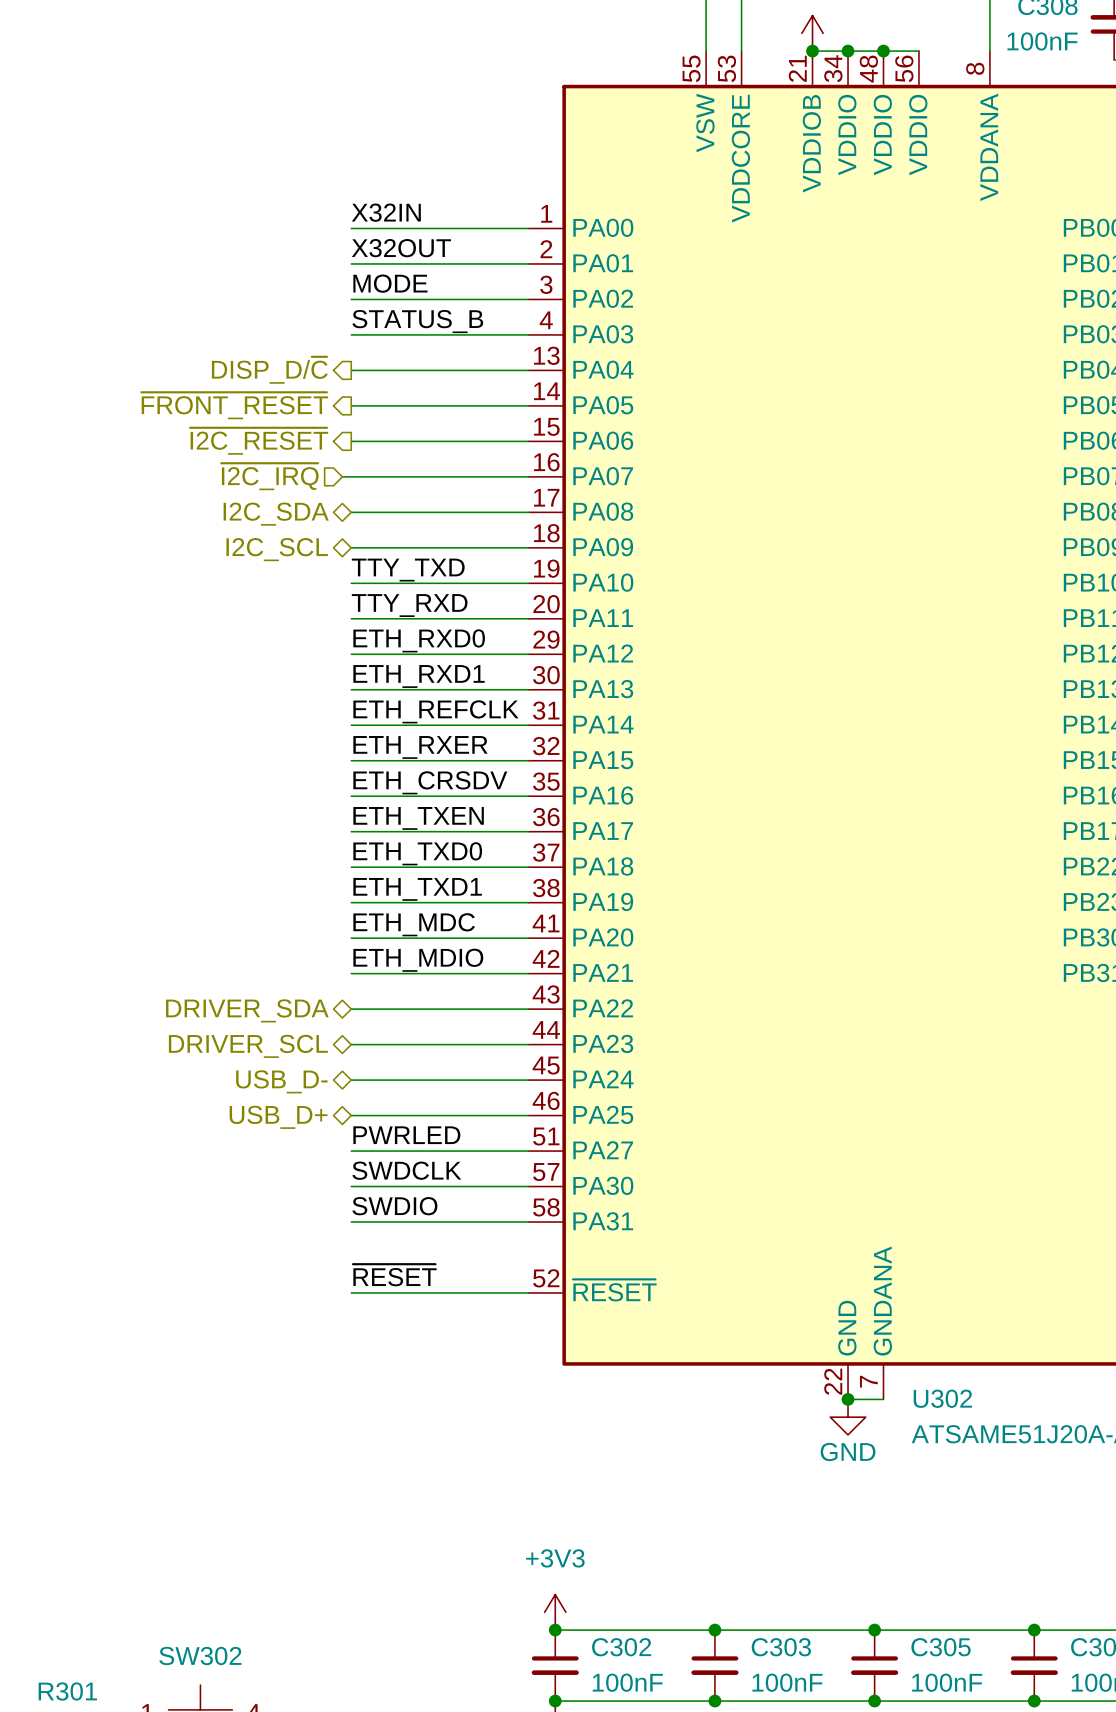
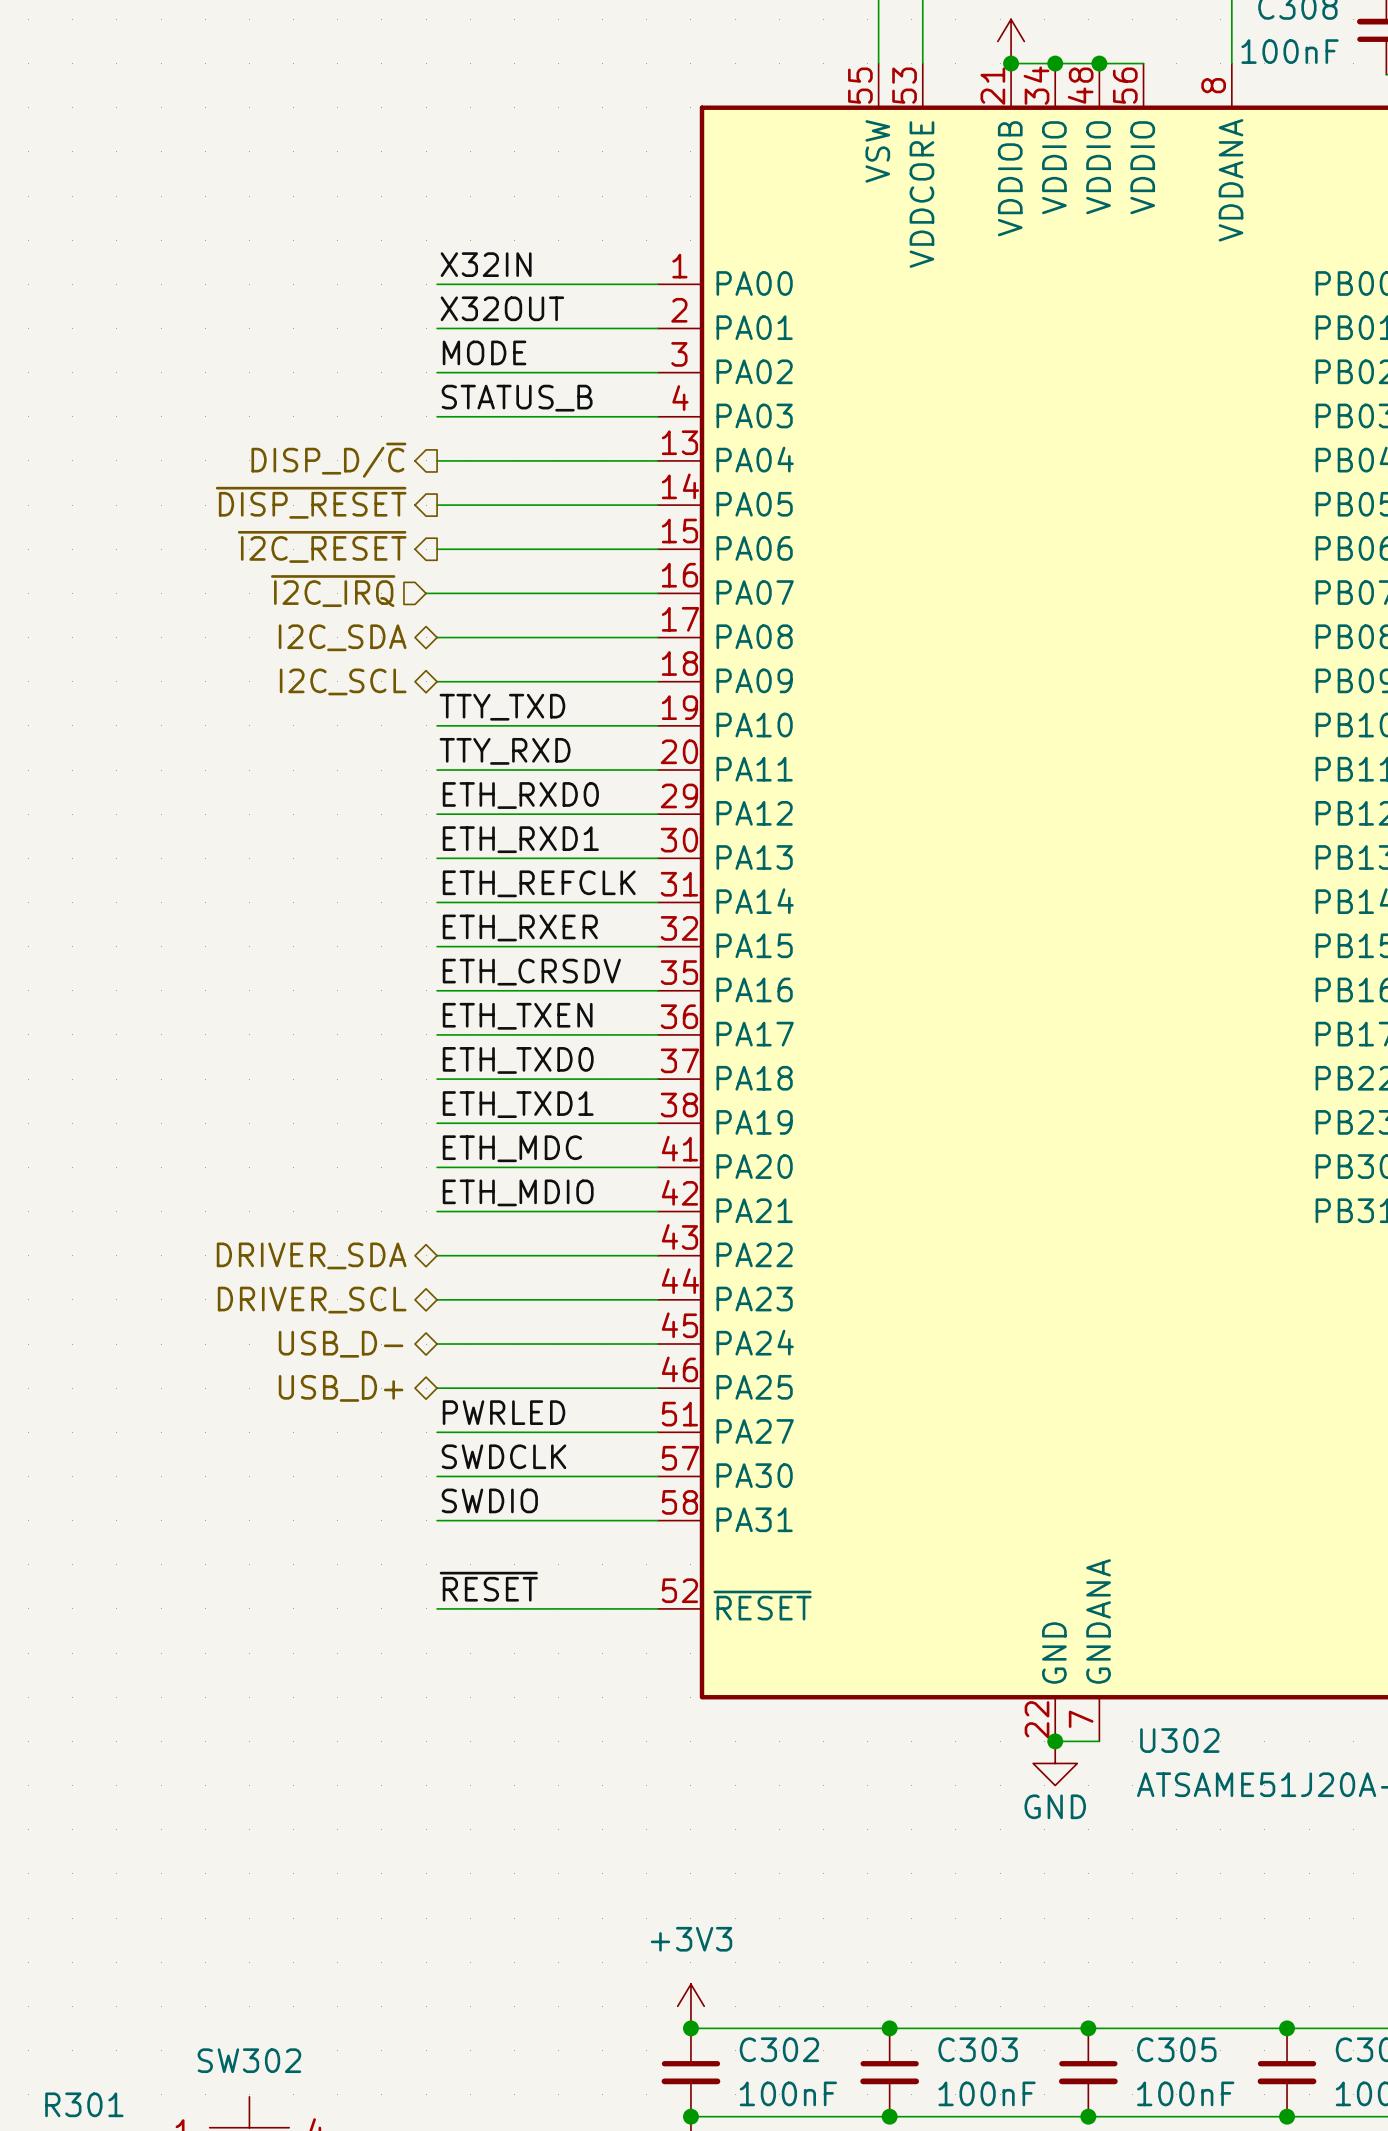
hierarchical label: ~{FRONT_RESET} (234, 405) -> ~{DISP_RESET} (311, 502)

